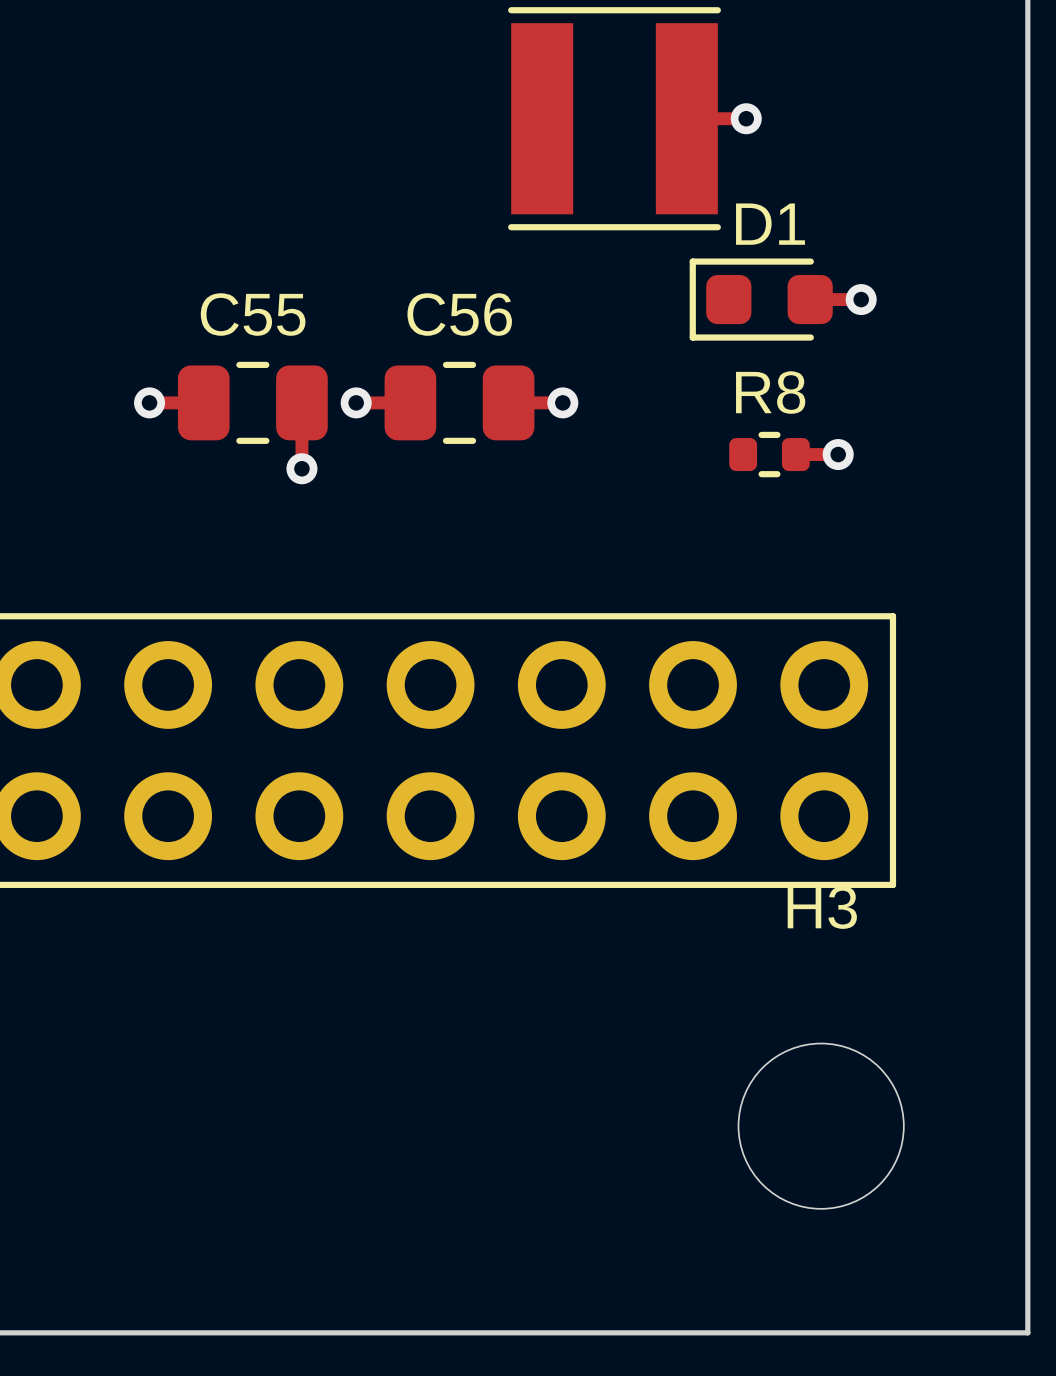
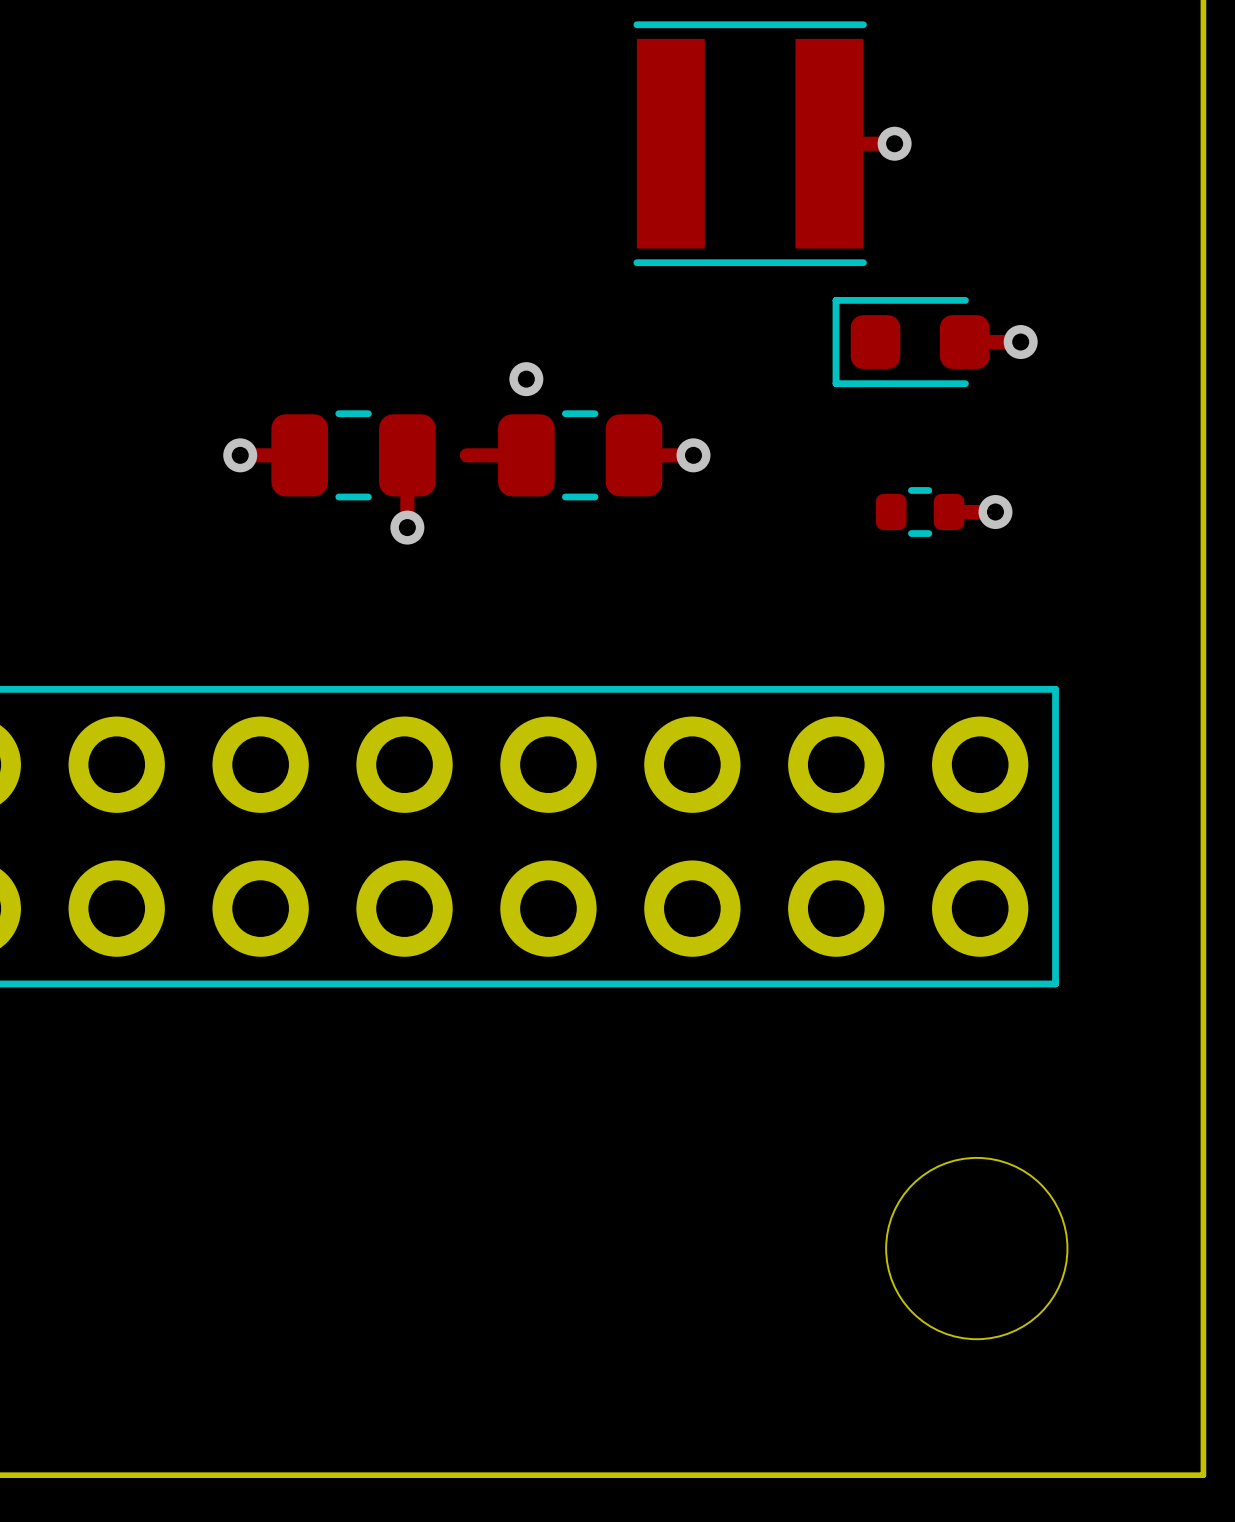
D1 name: D1 (770, 224) -> none
C55 name: C55 (253, 314) -> none
C56 name: C56 (459, 314) -> none
R8 name: R8 (770, 392) -> none
via position: (356, 402) -> (526, 379)
H3 name: H3 (822, 907) -> none

